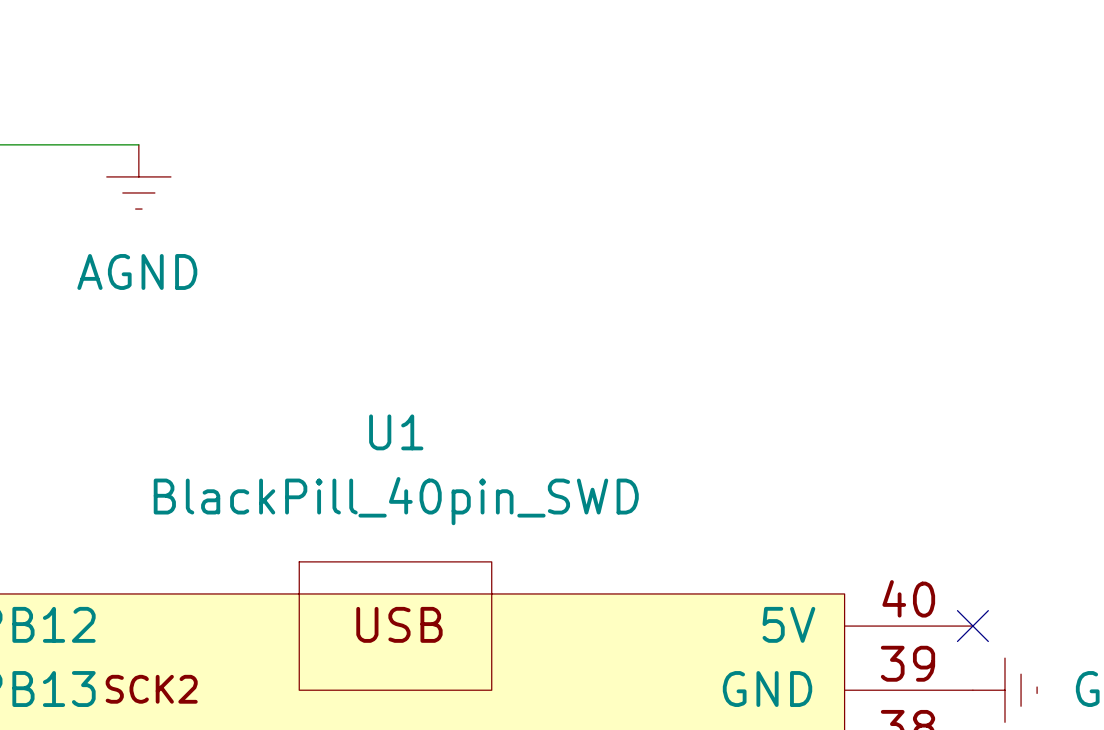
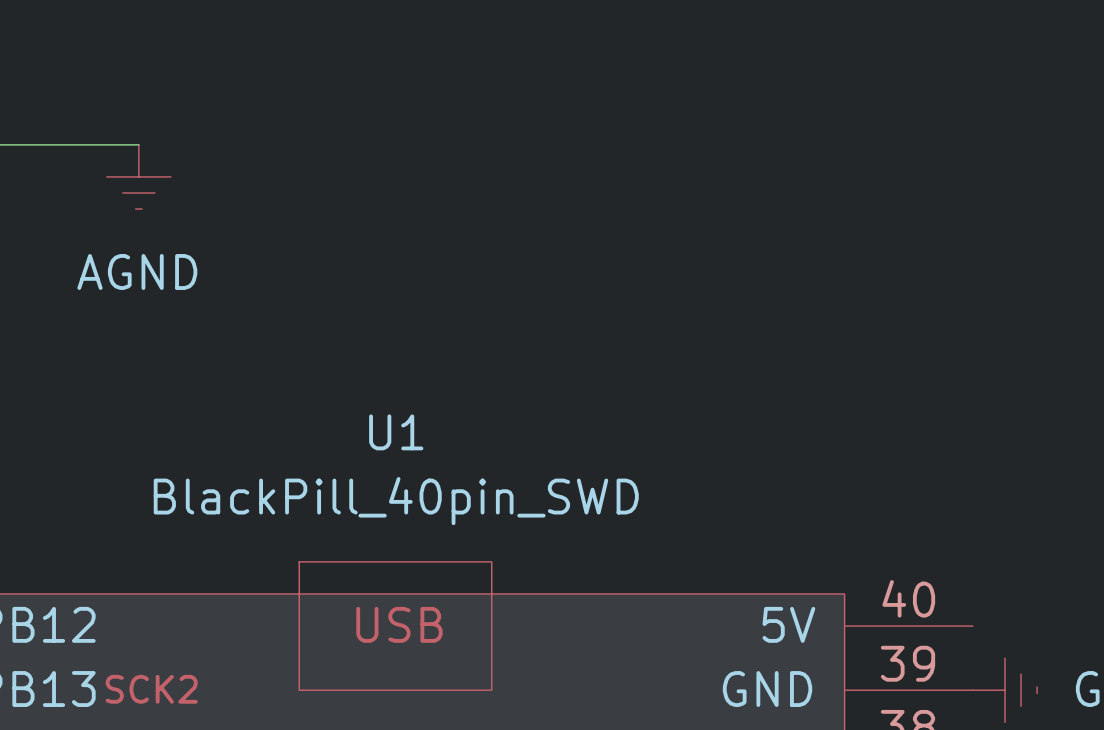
no-connect mark: (972, 626) -> none

